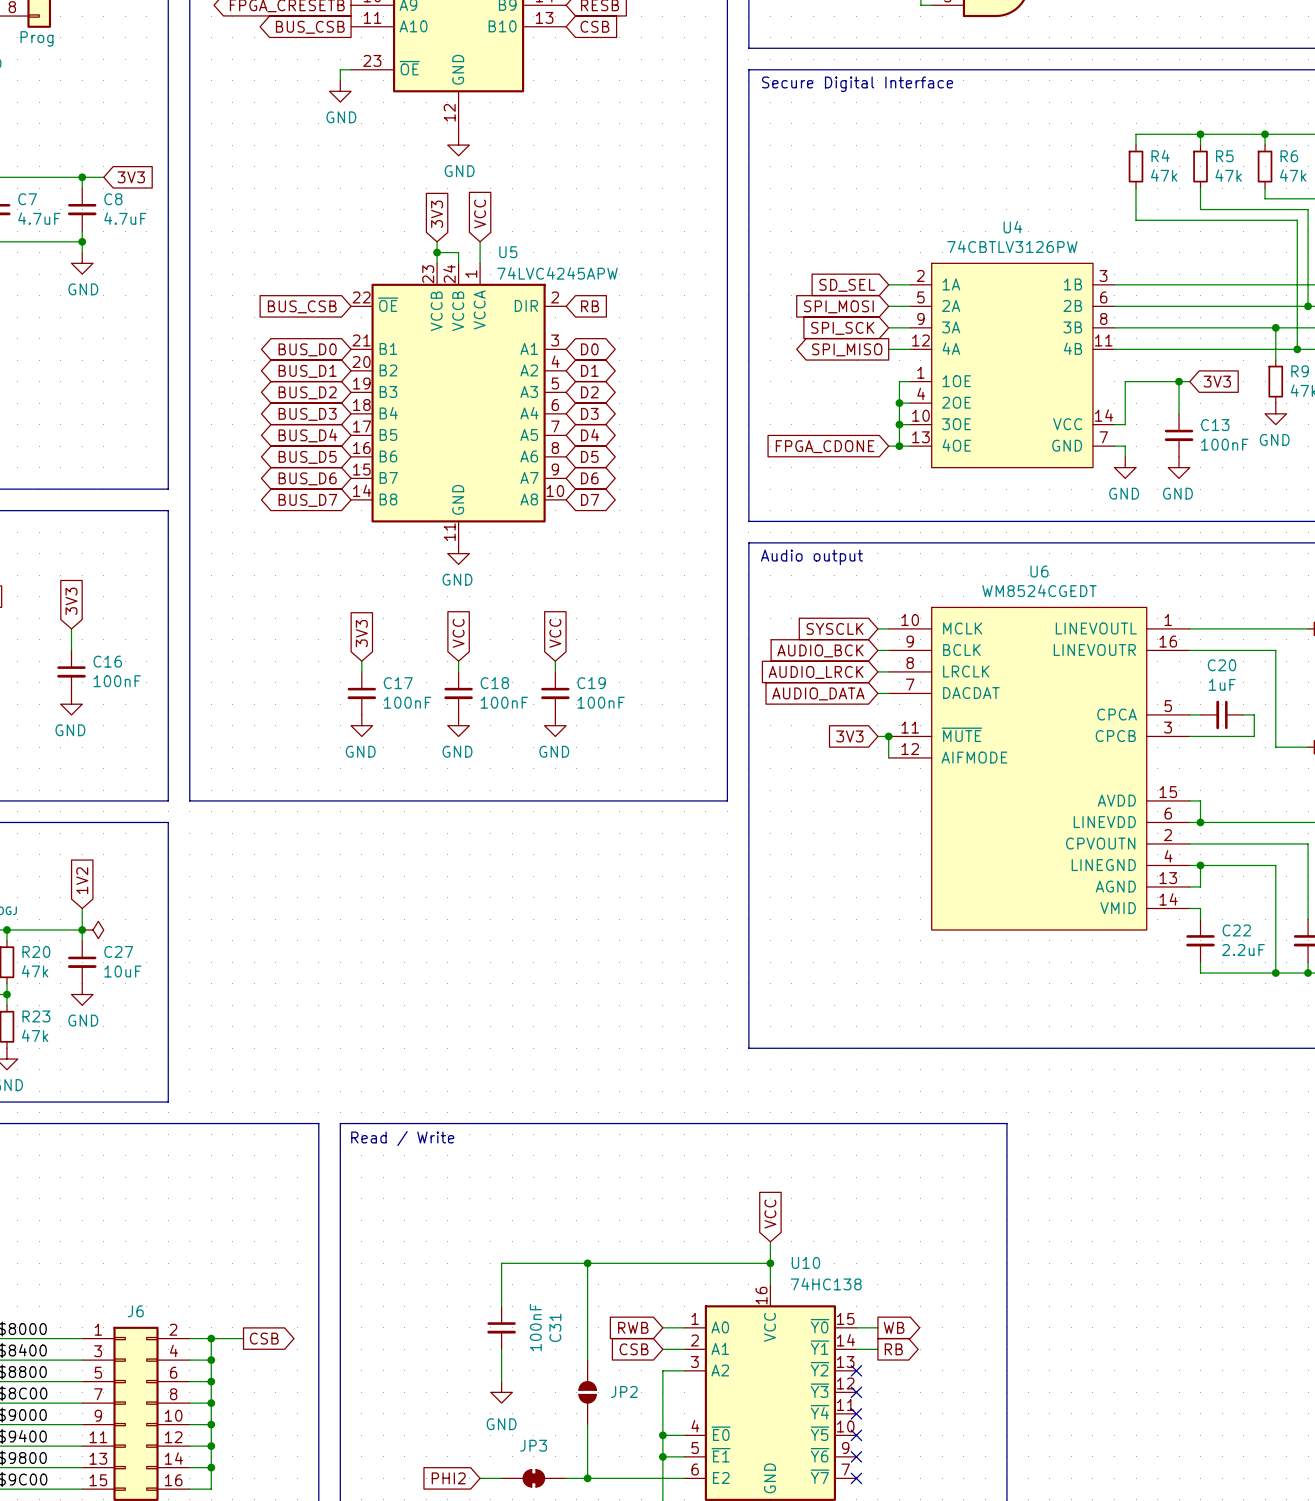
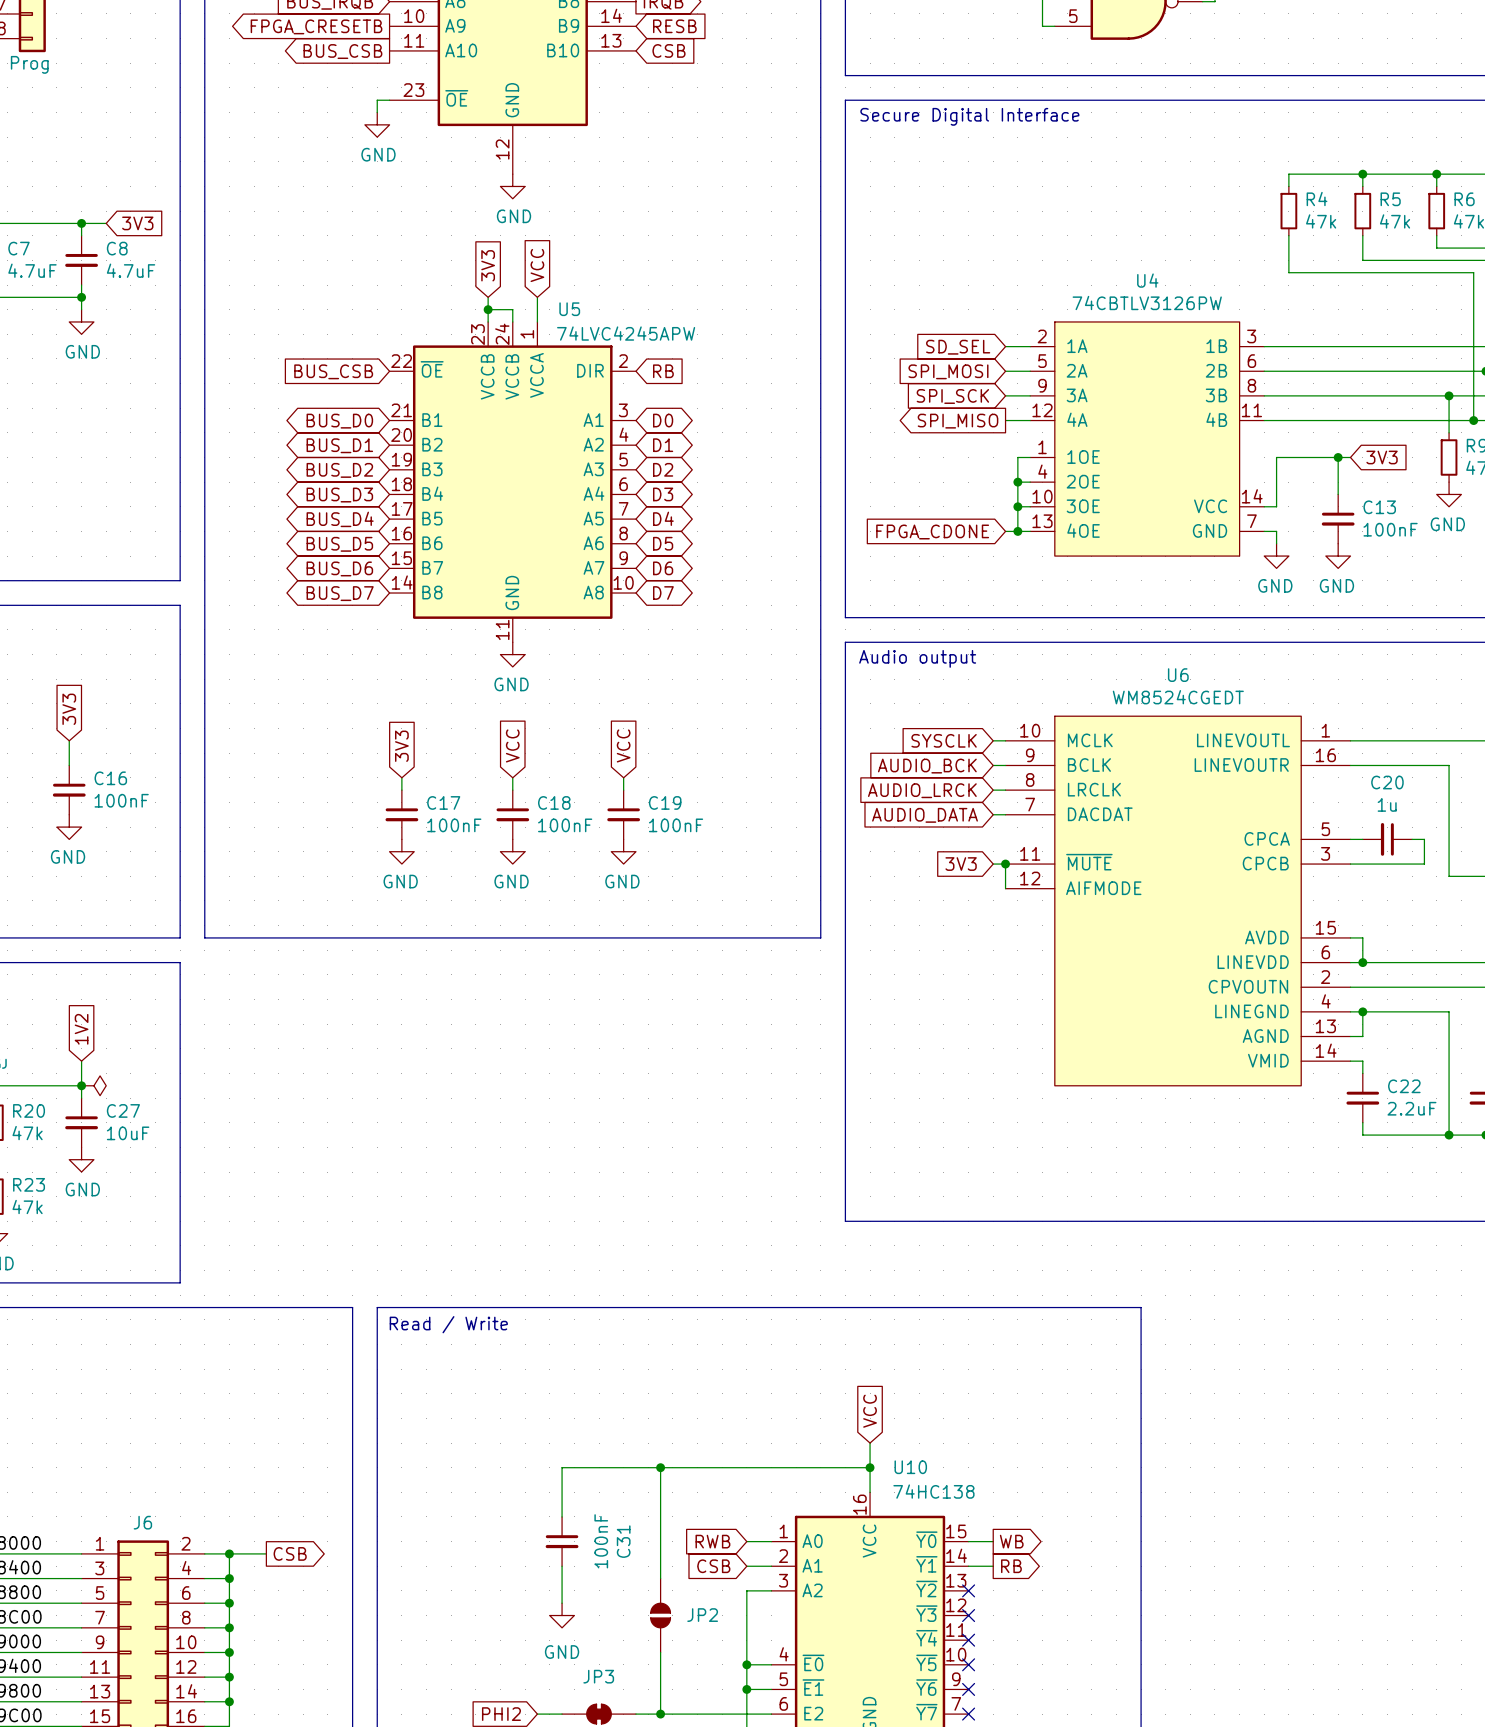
C20 value: 1uF (1222, 684) -> 1u (1387, 804)

